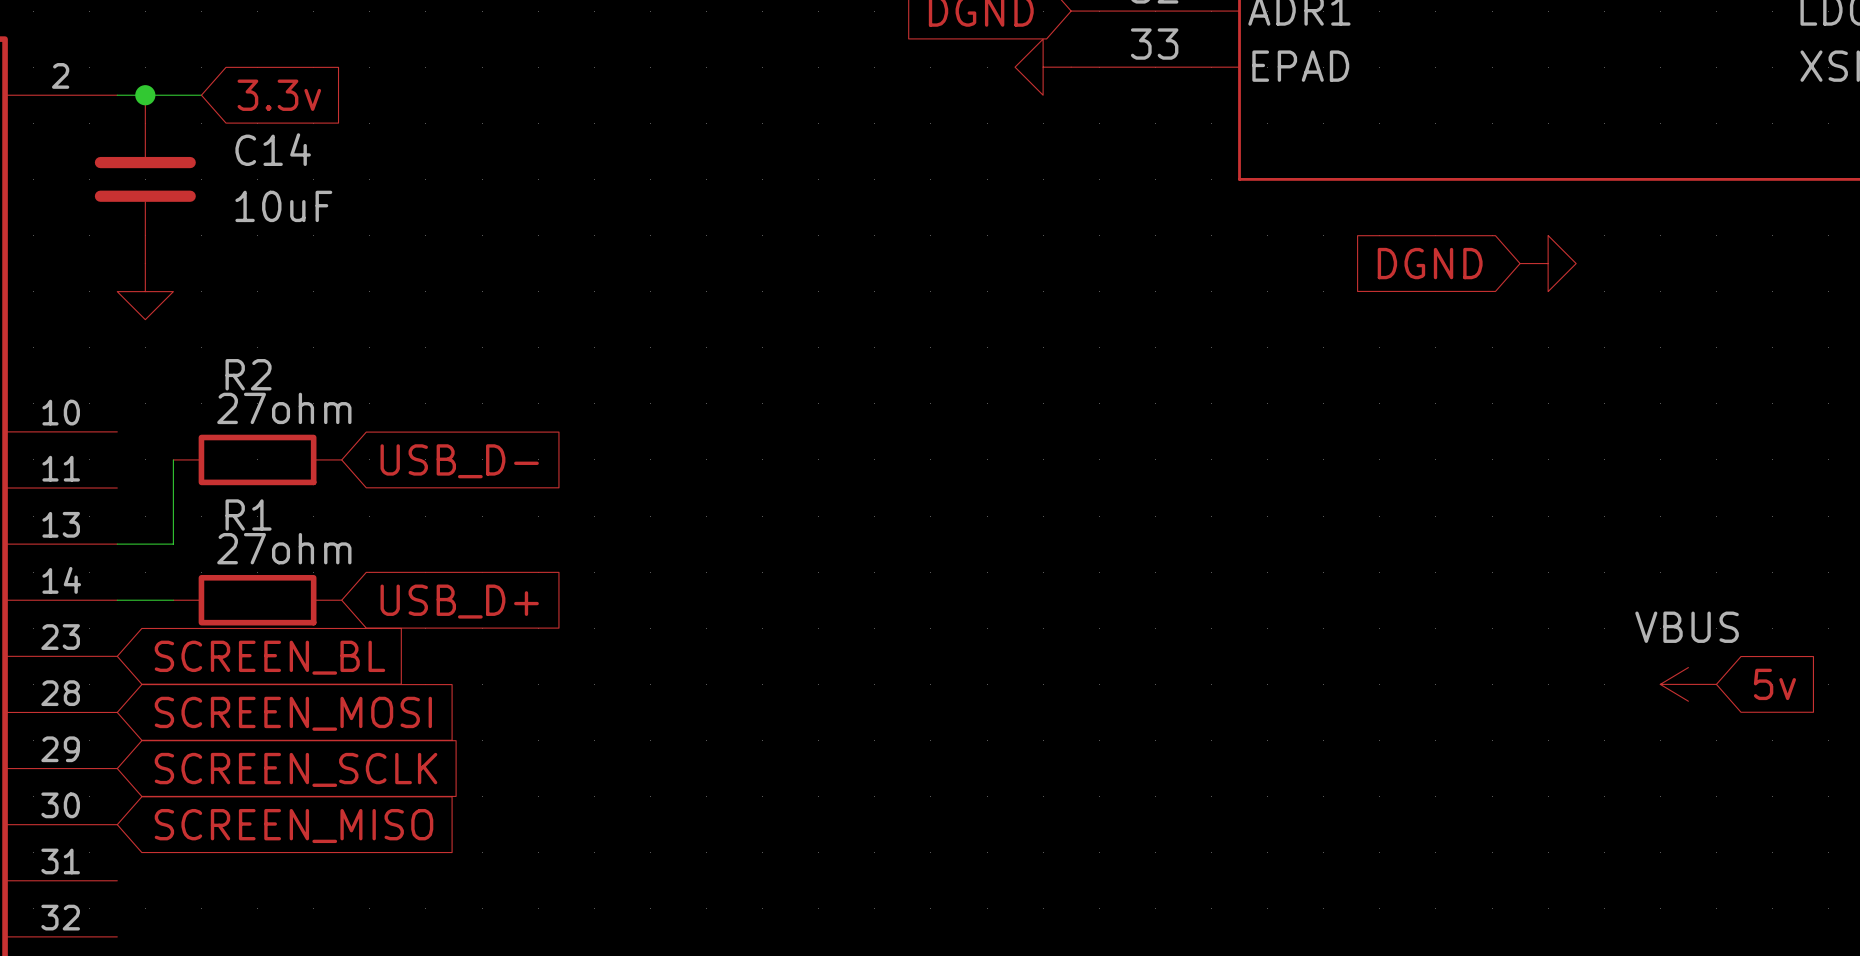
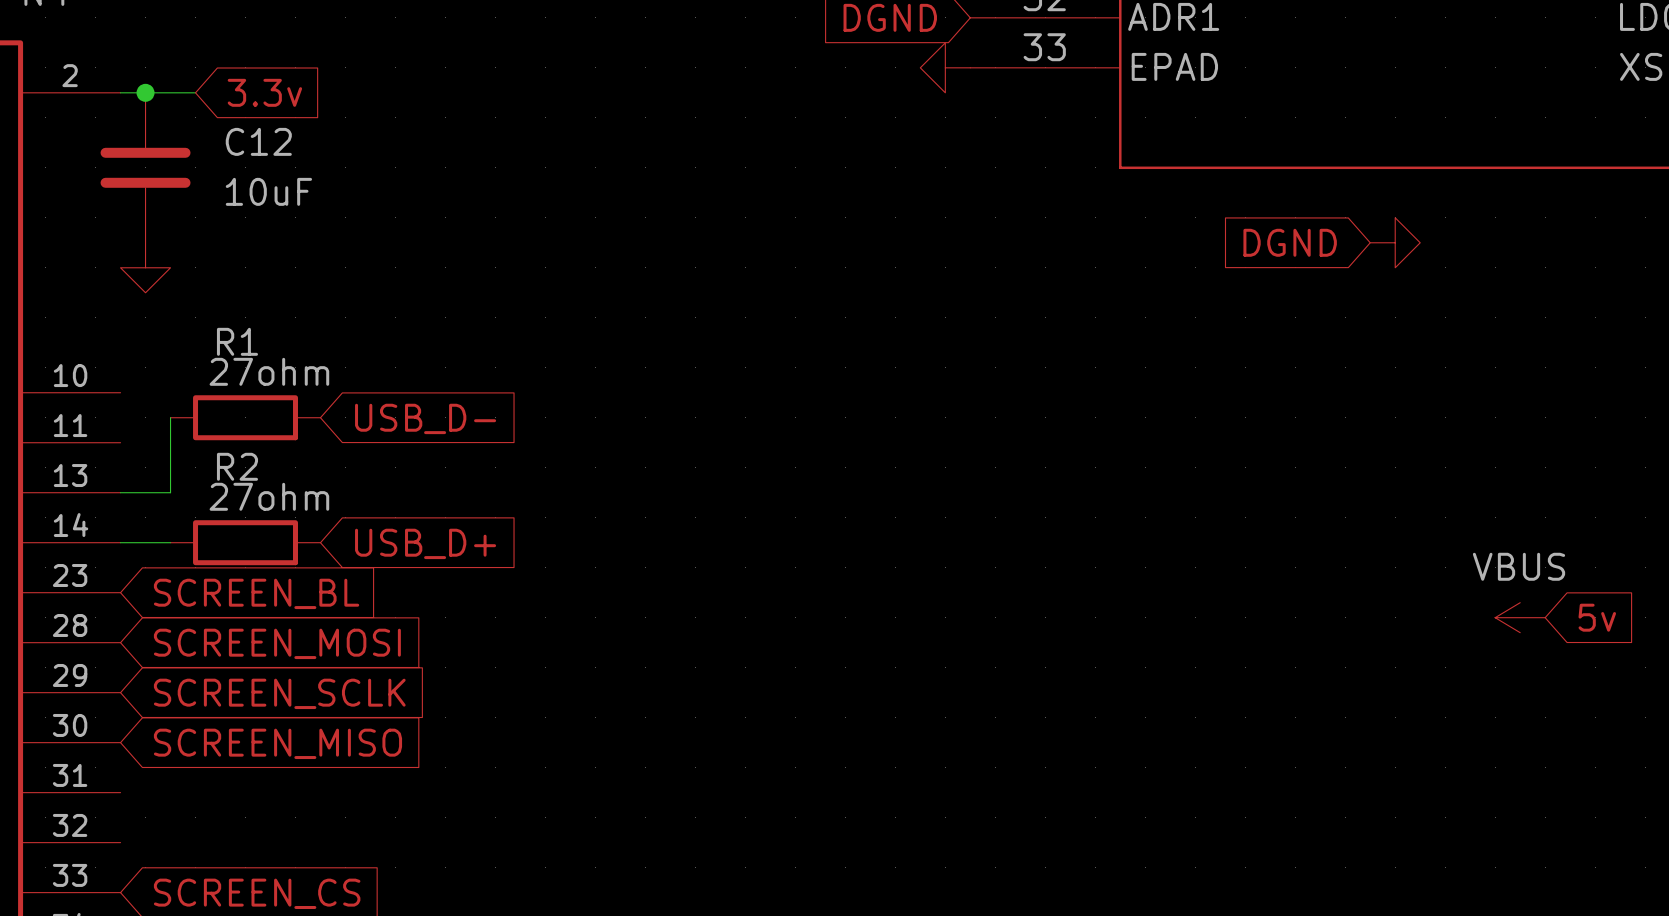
C14 name: C14 (273, 149) -> C12 (258, 141)
R2 name: R2 (248, 374) -> R1 (237, 341)
R1 name: R1 (248, 515) -> R2 (237, 466)

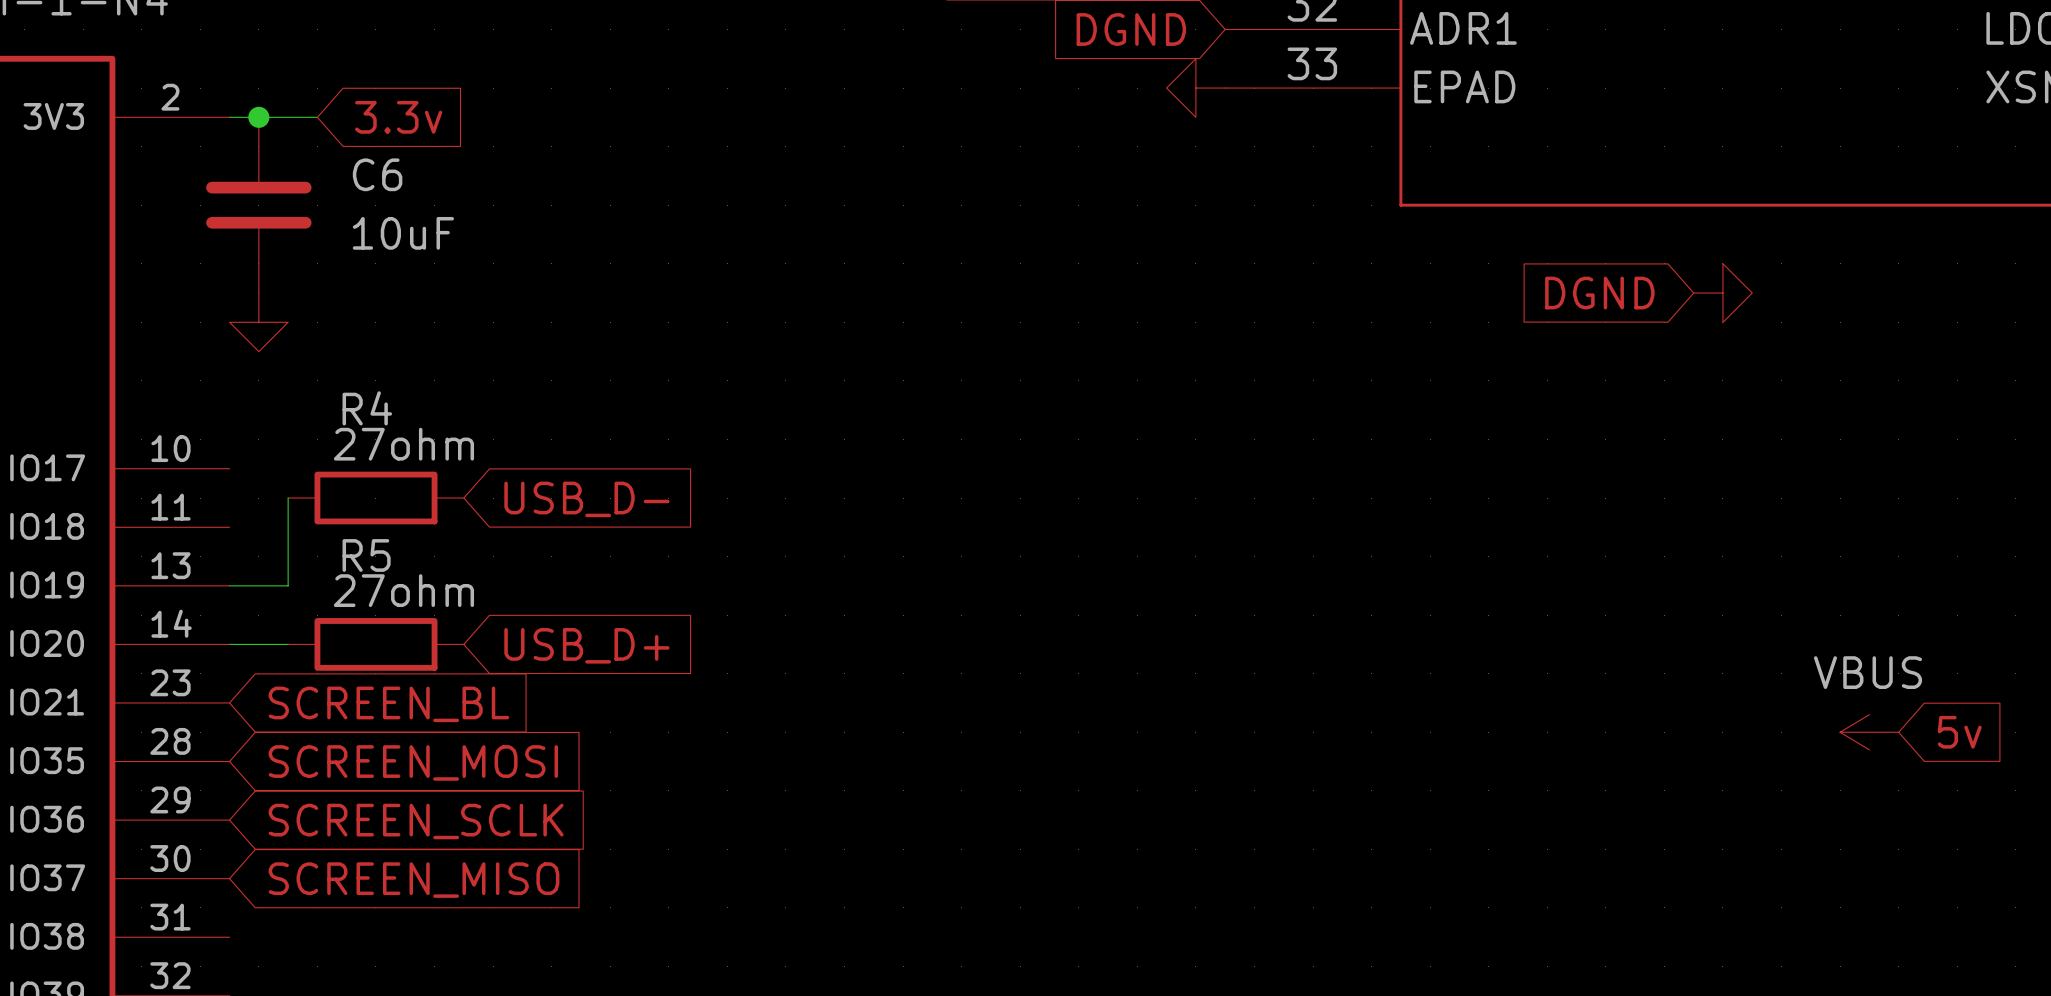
C12 name: C12 (258, 141) -> C6 (377, 174)
R1 name: R1 (237, 341) -> R4 (367, 408)
R2 name: R2 (237, 466) -> R5 (366, 555)

